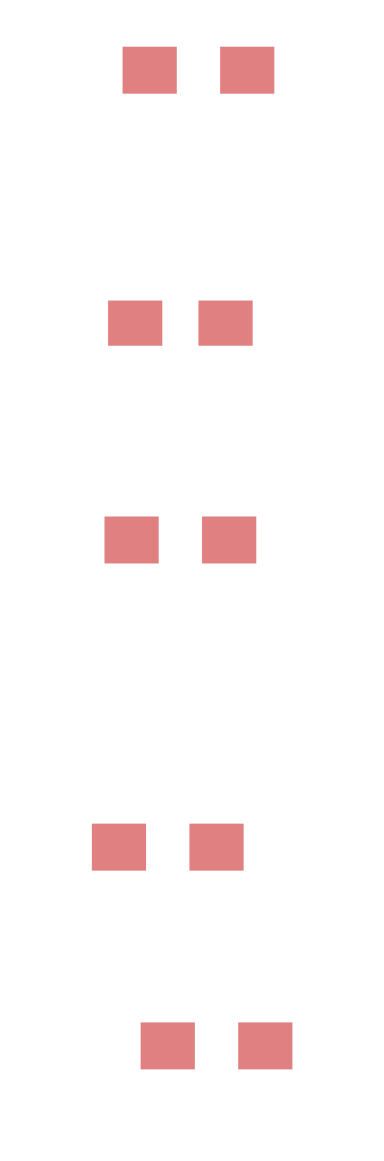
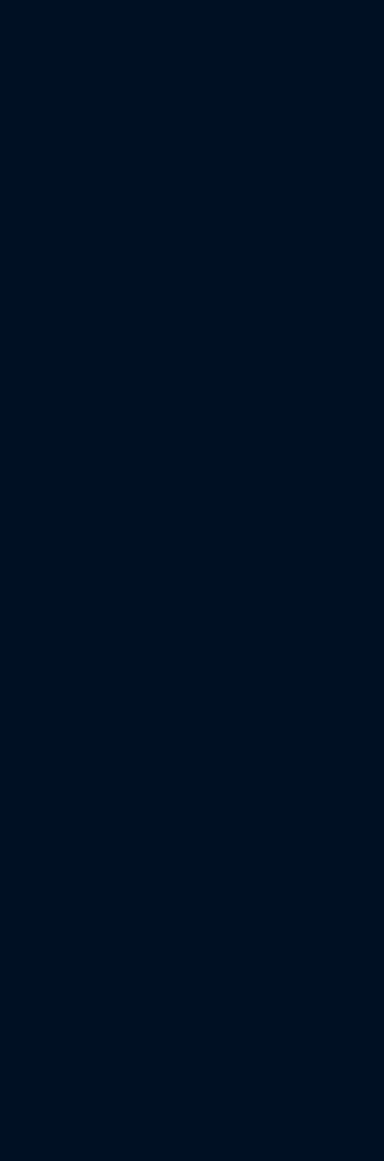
part: (198, 70) -> none
part: (180, 323) -> none
part: (180, 539) -> none
part: (167, 847) -> none
part: (216, 1045) -> none

